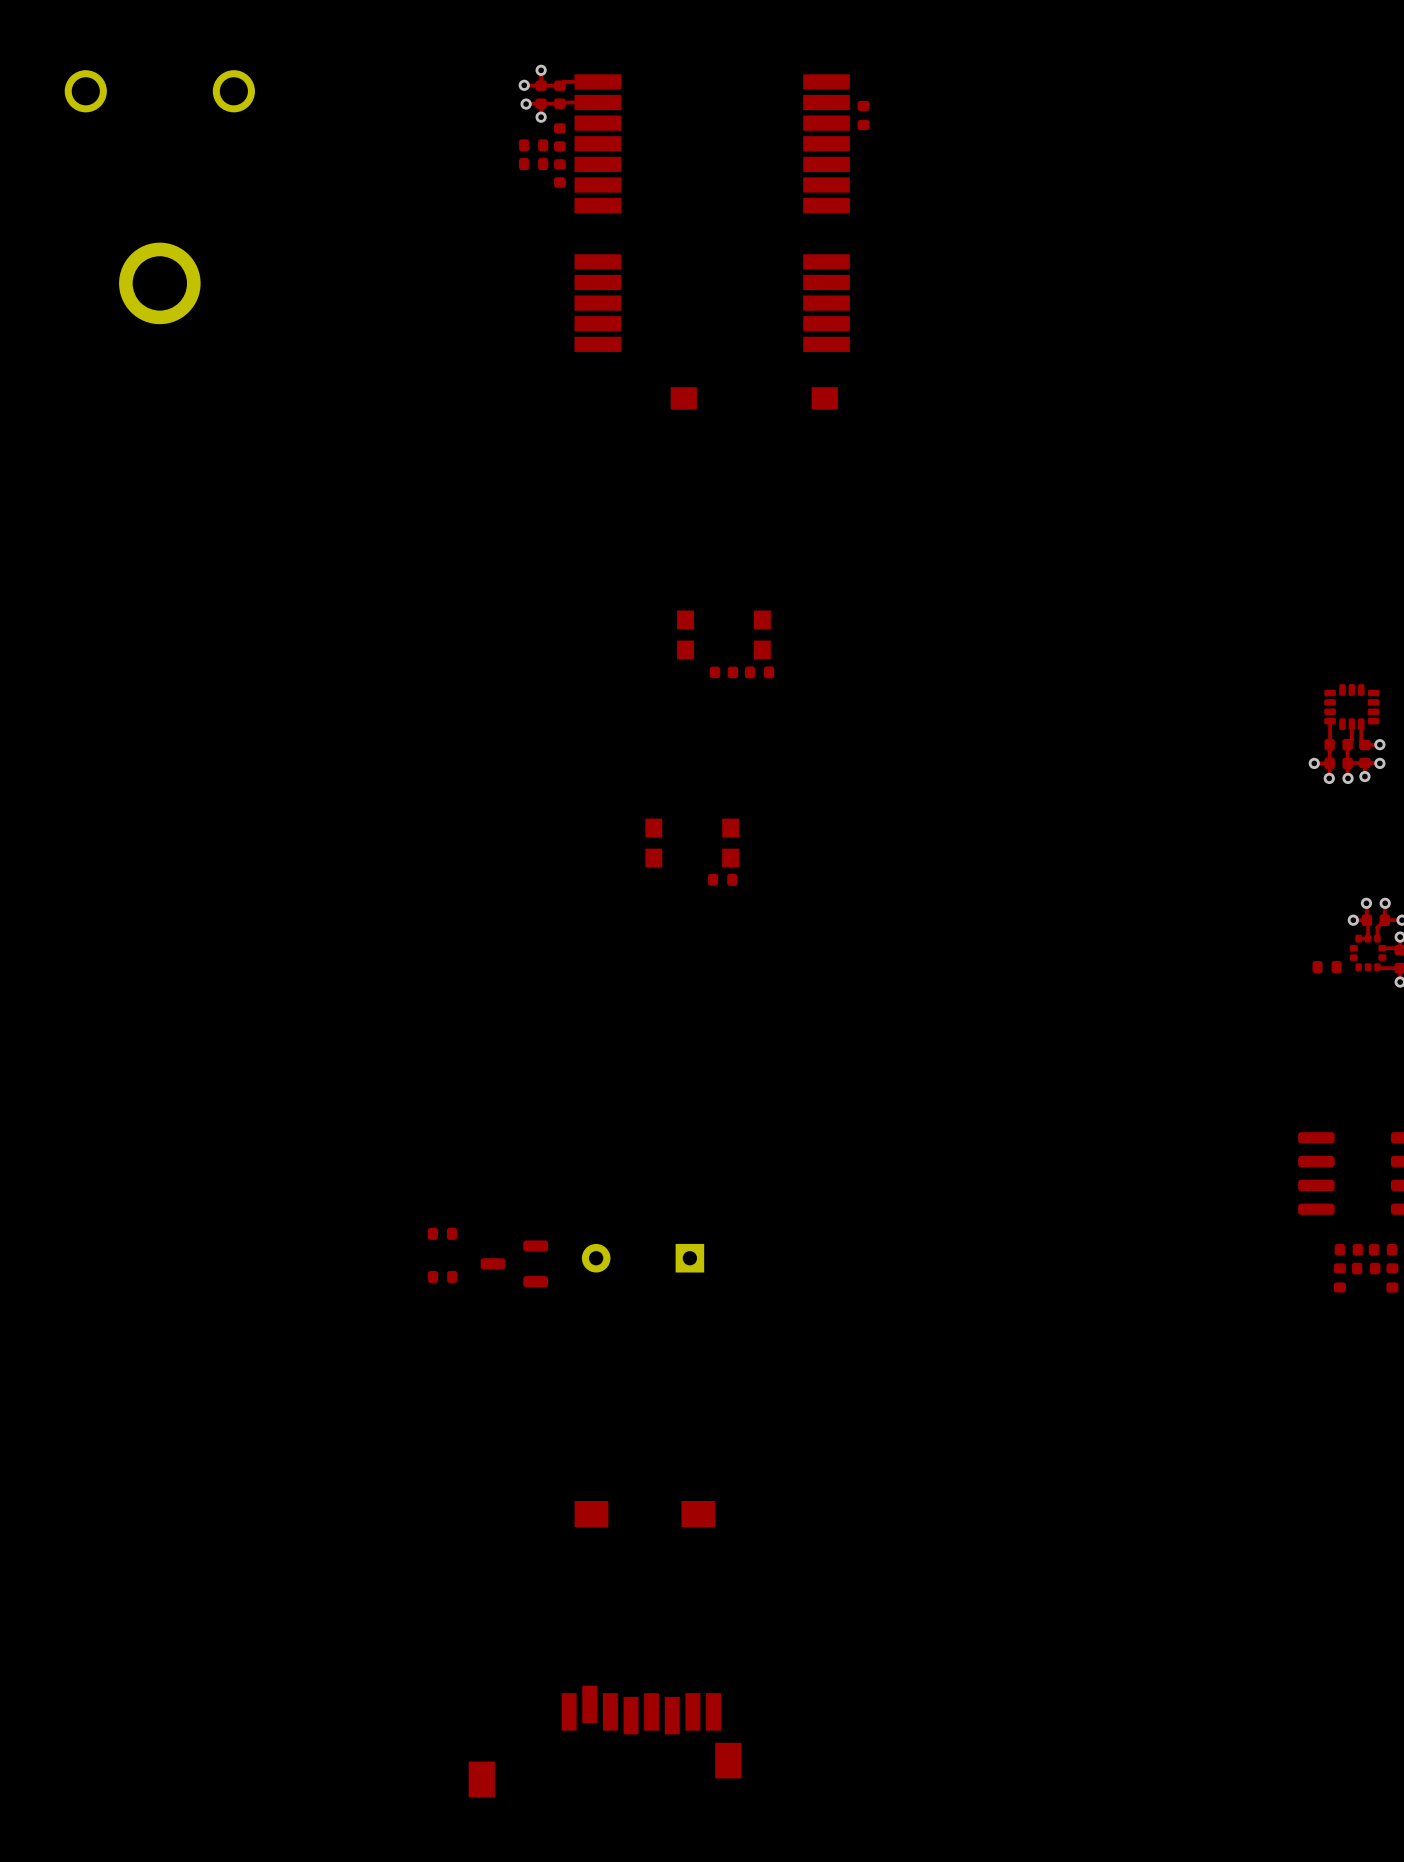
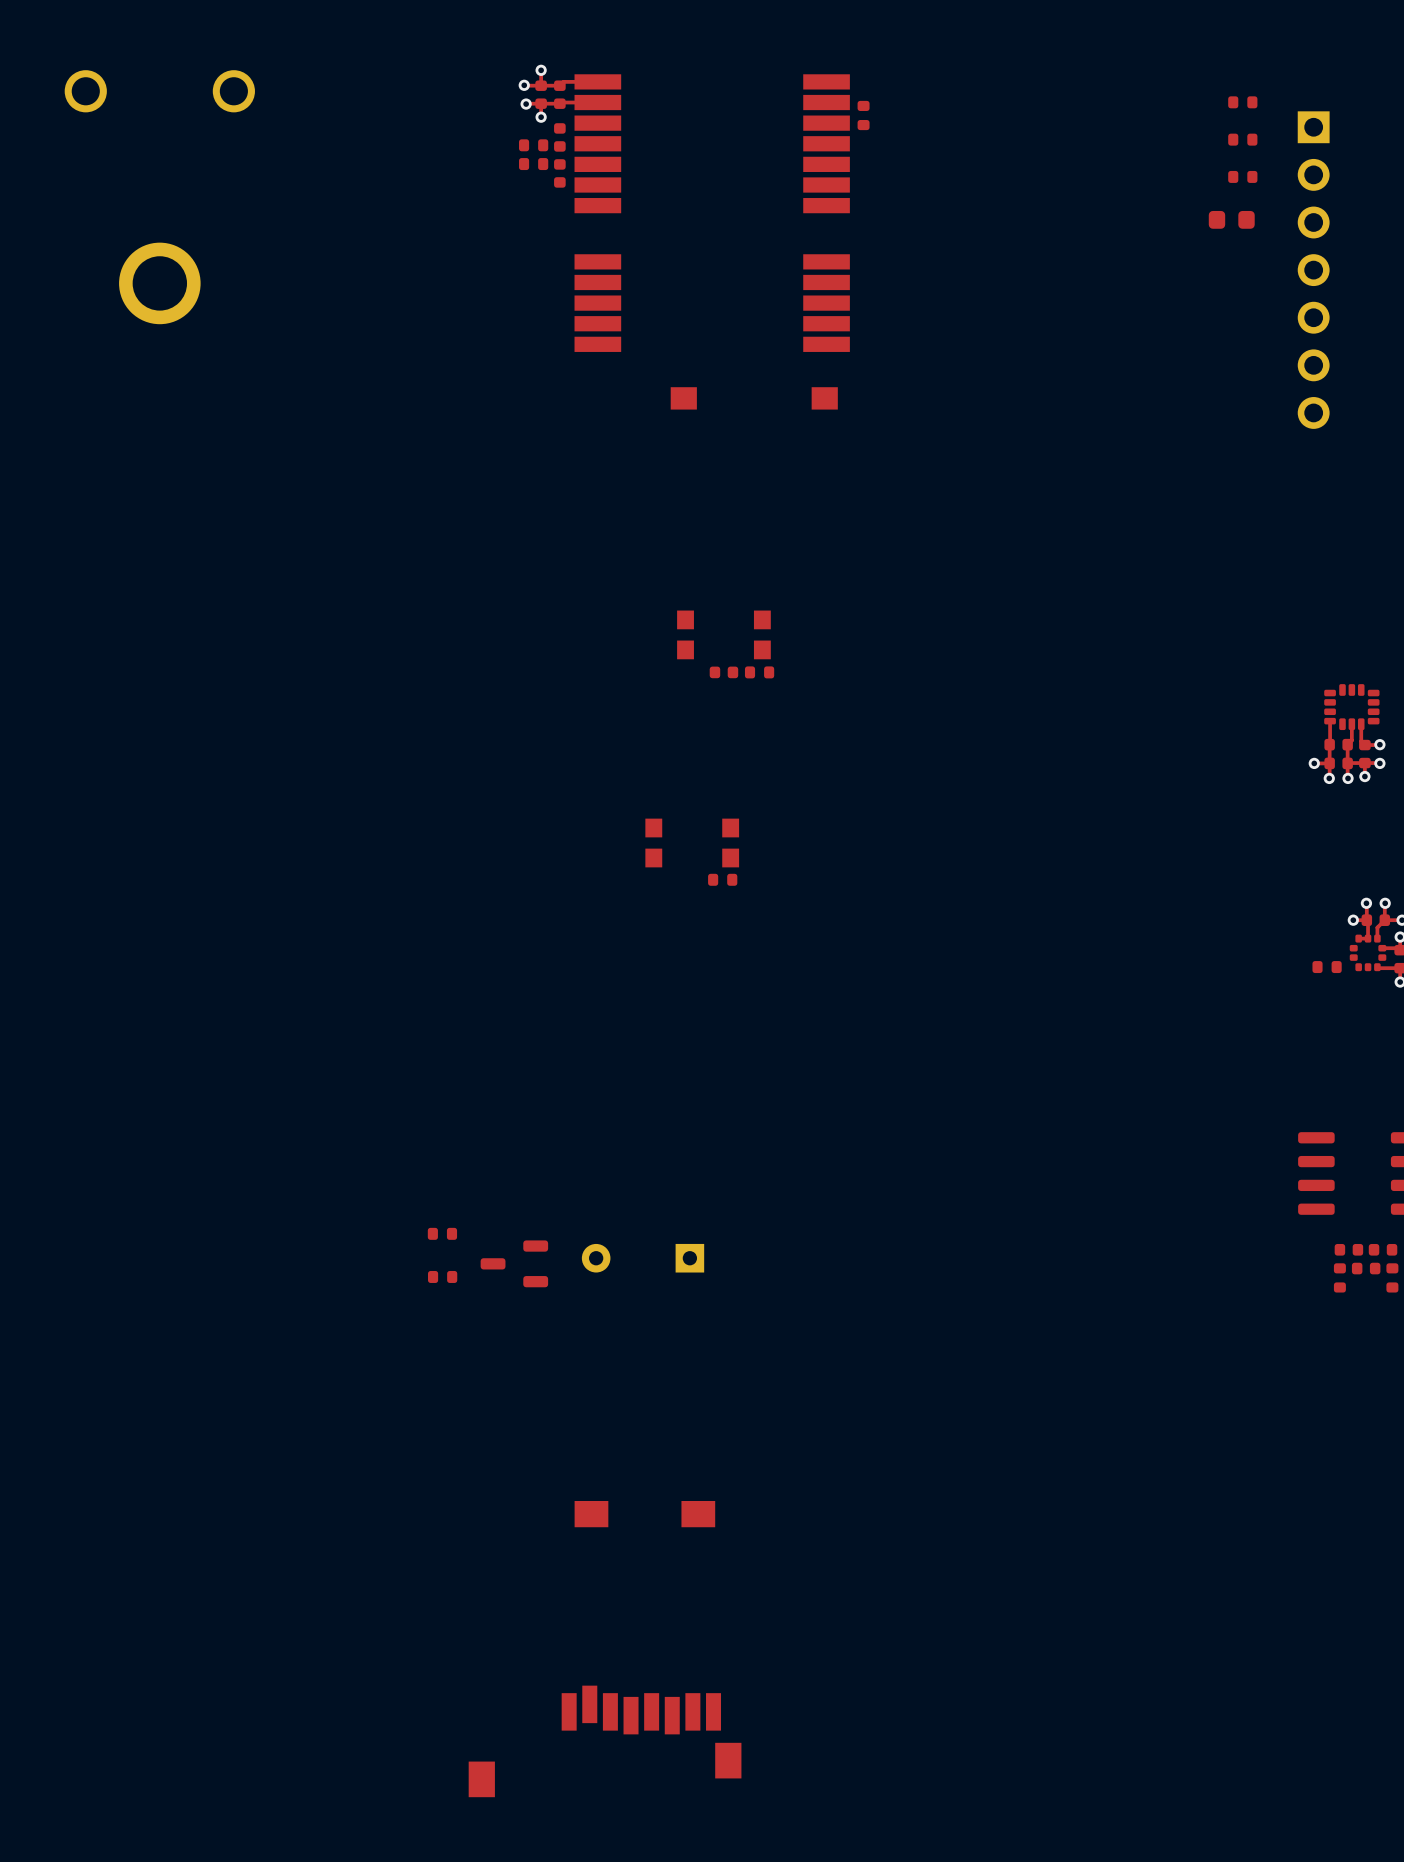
part: none -> (1242, 102)
part: none -> (1242, 139)
part: none -> (1242, 176)
part: none -> (1231, 219)
part: none -> (1313, 270)

